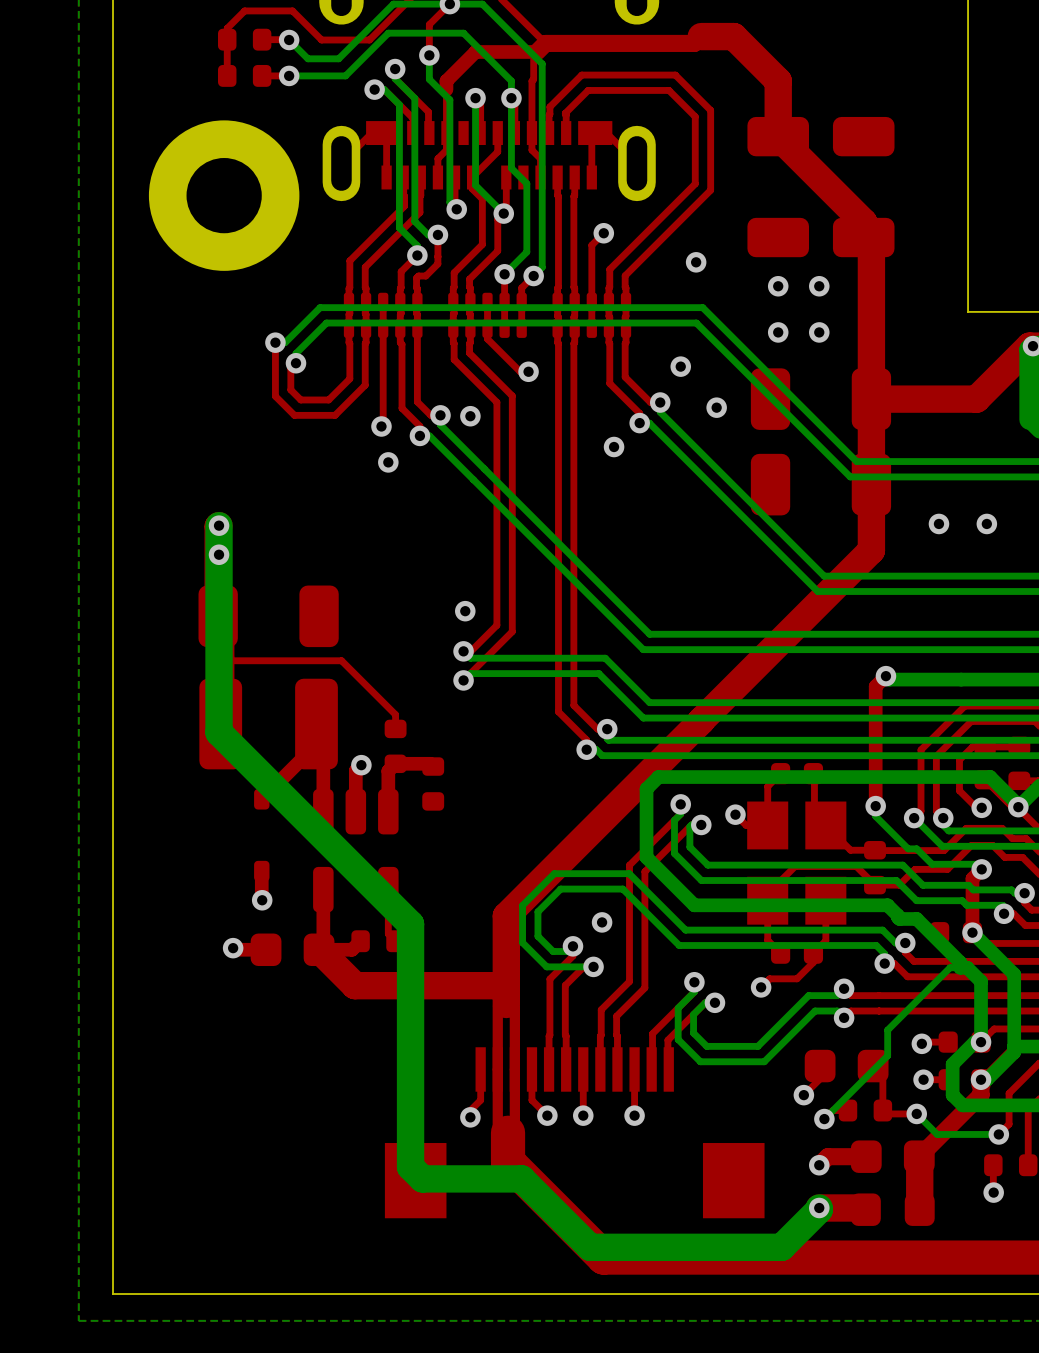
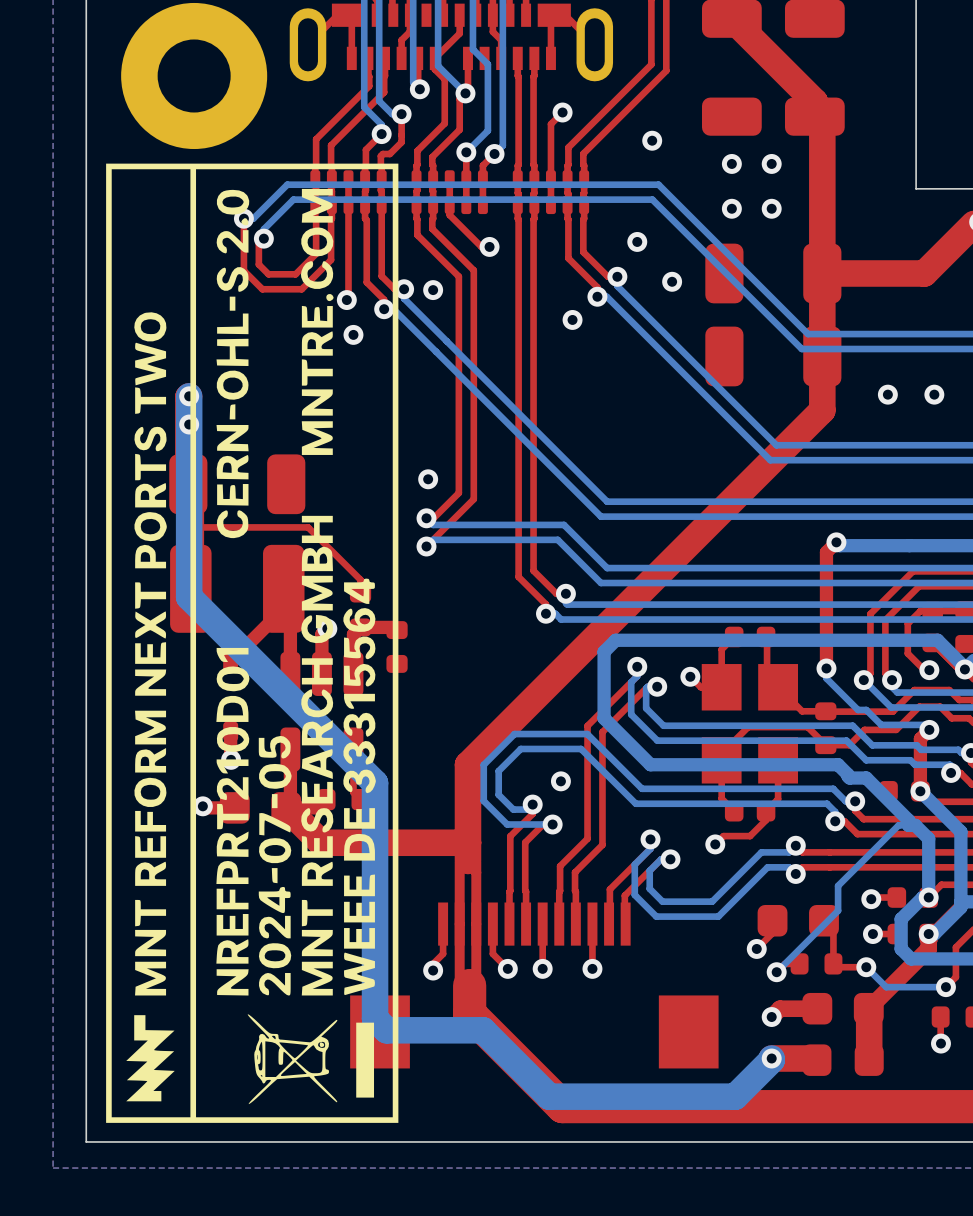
drawing: none -> [106, 163, 399, 1123]
top track: (871, 540) (871, 550) (701, 720) -> none
top track: (701, 721) (506, 916) -> (822, 410) (467, 764) (467, 775)

